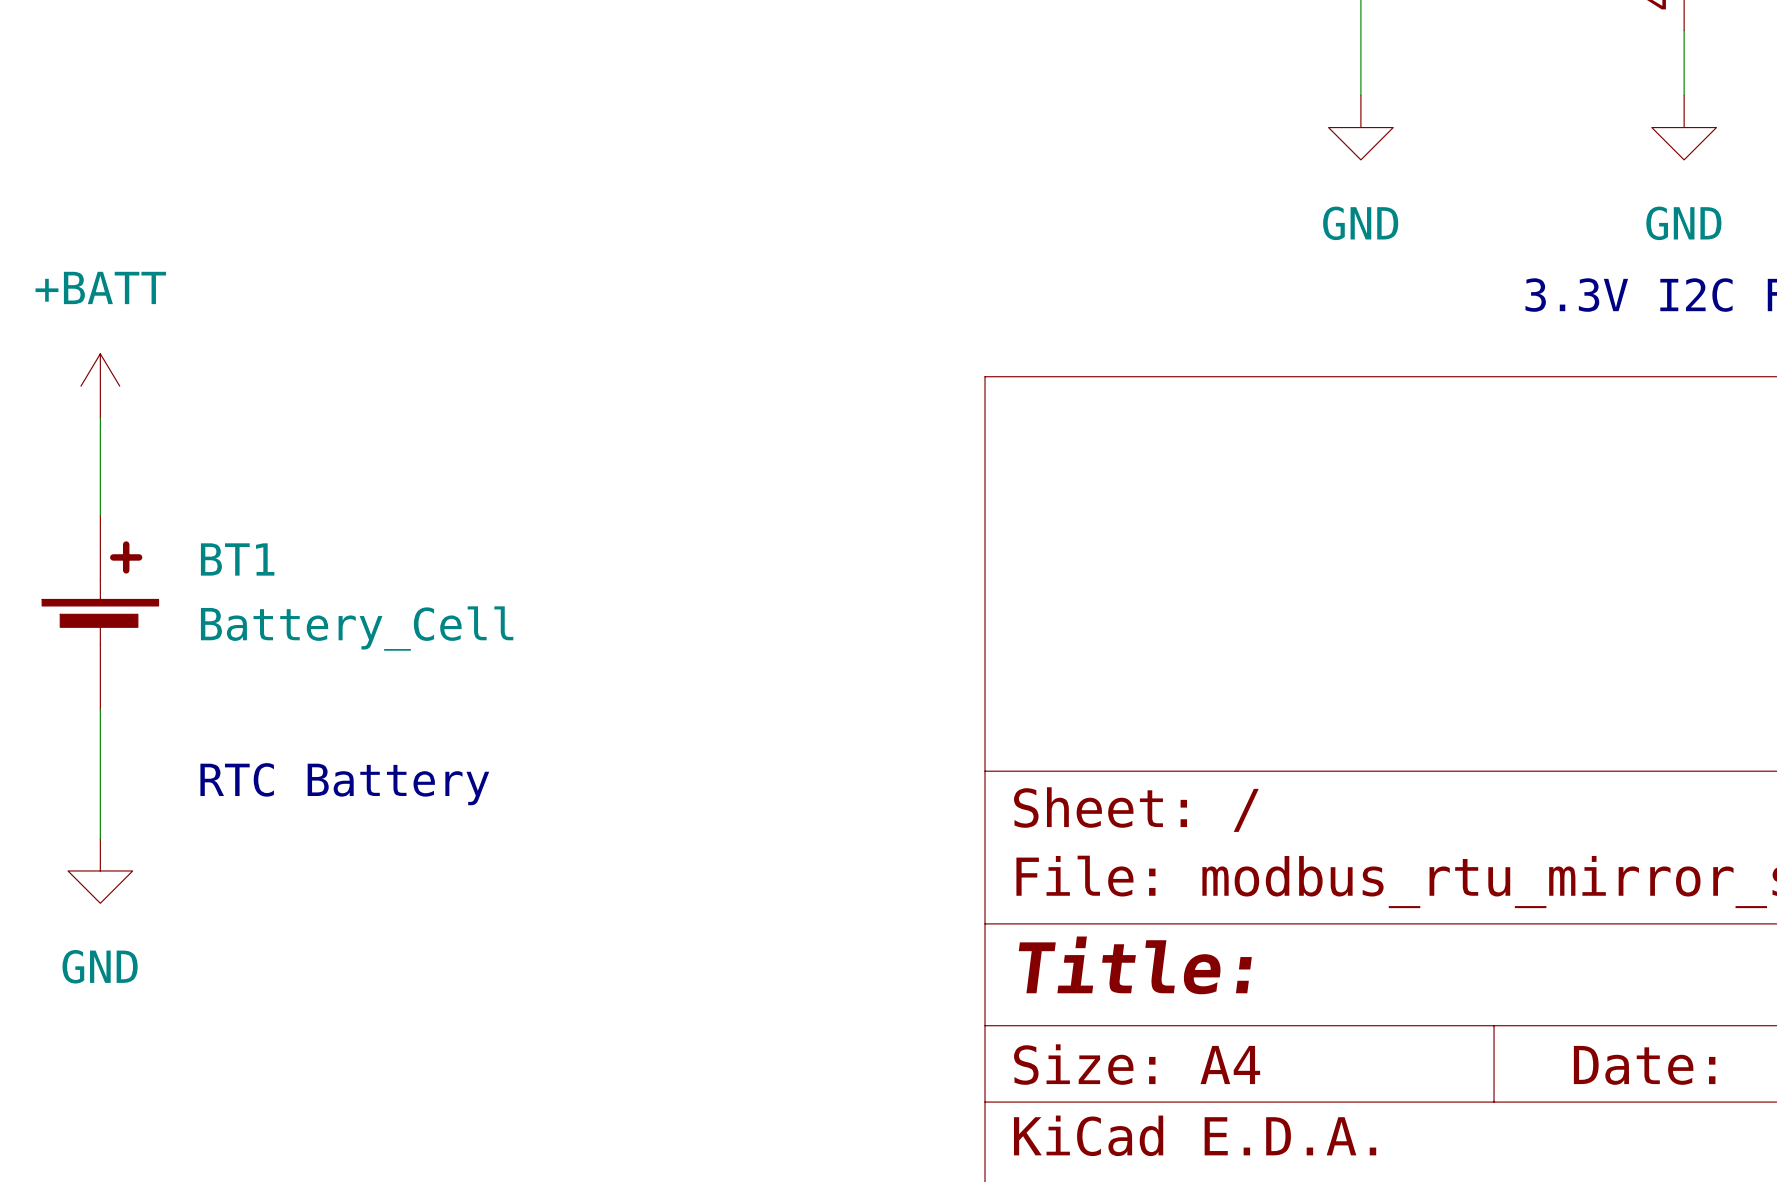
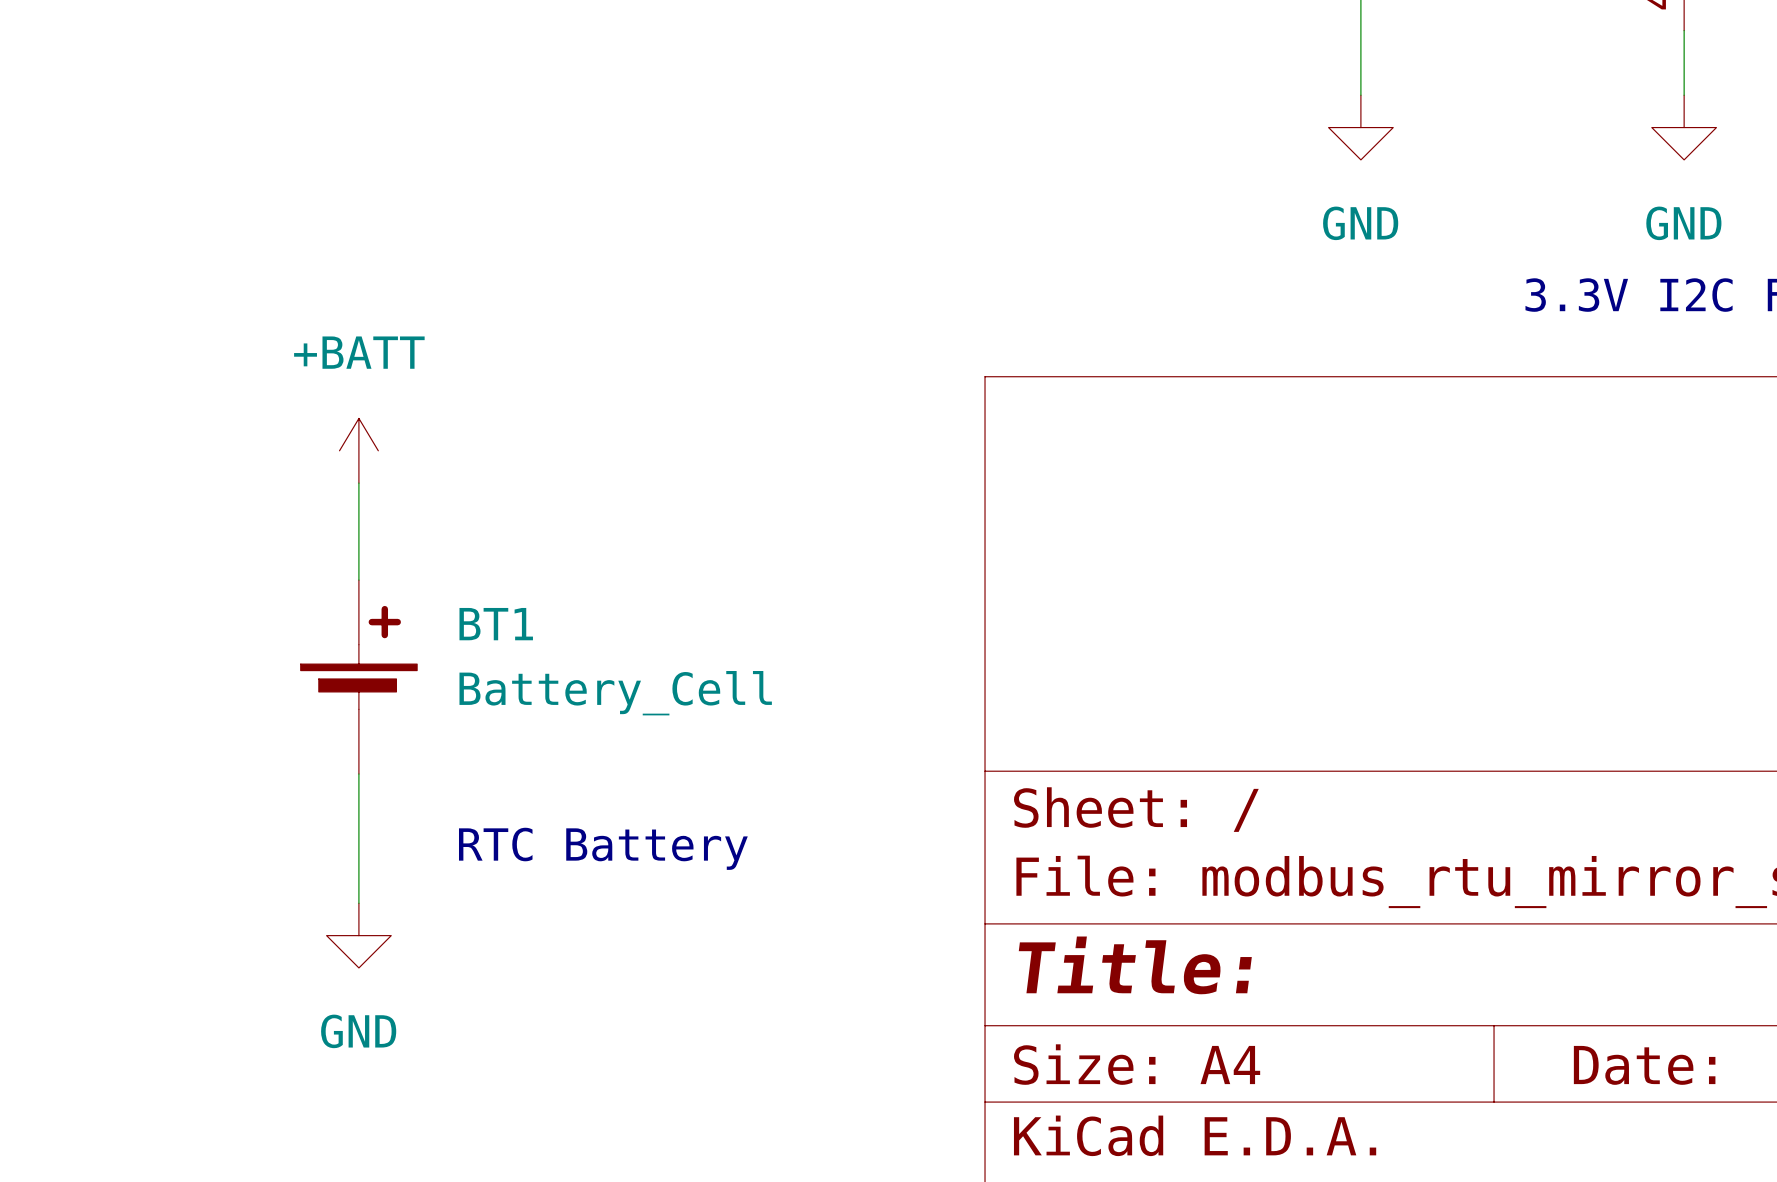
power symbol position: +BATT (100, 386) -> +BATT (358, 450)
wire: (100, 418) (100, 515) -> (358, 483) (358, 580)
BT1 position: (100, 612) -> (358, 677)
wire: (100, 709) (100, 838) -> (358, 774) (358, 903)
text position: RTC Battery (344, 784) -> RTC Battery (603, 848)
power symbol position: GND (100, 870) -> GND (358, 935)

